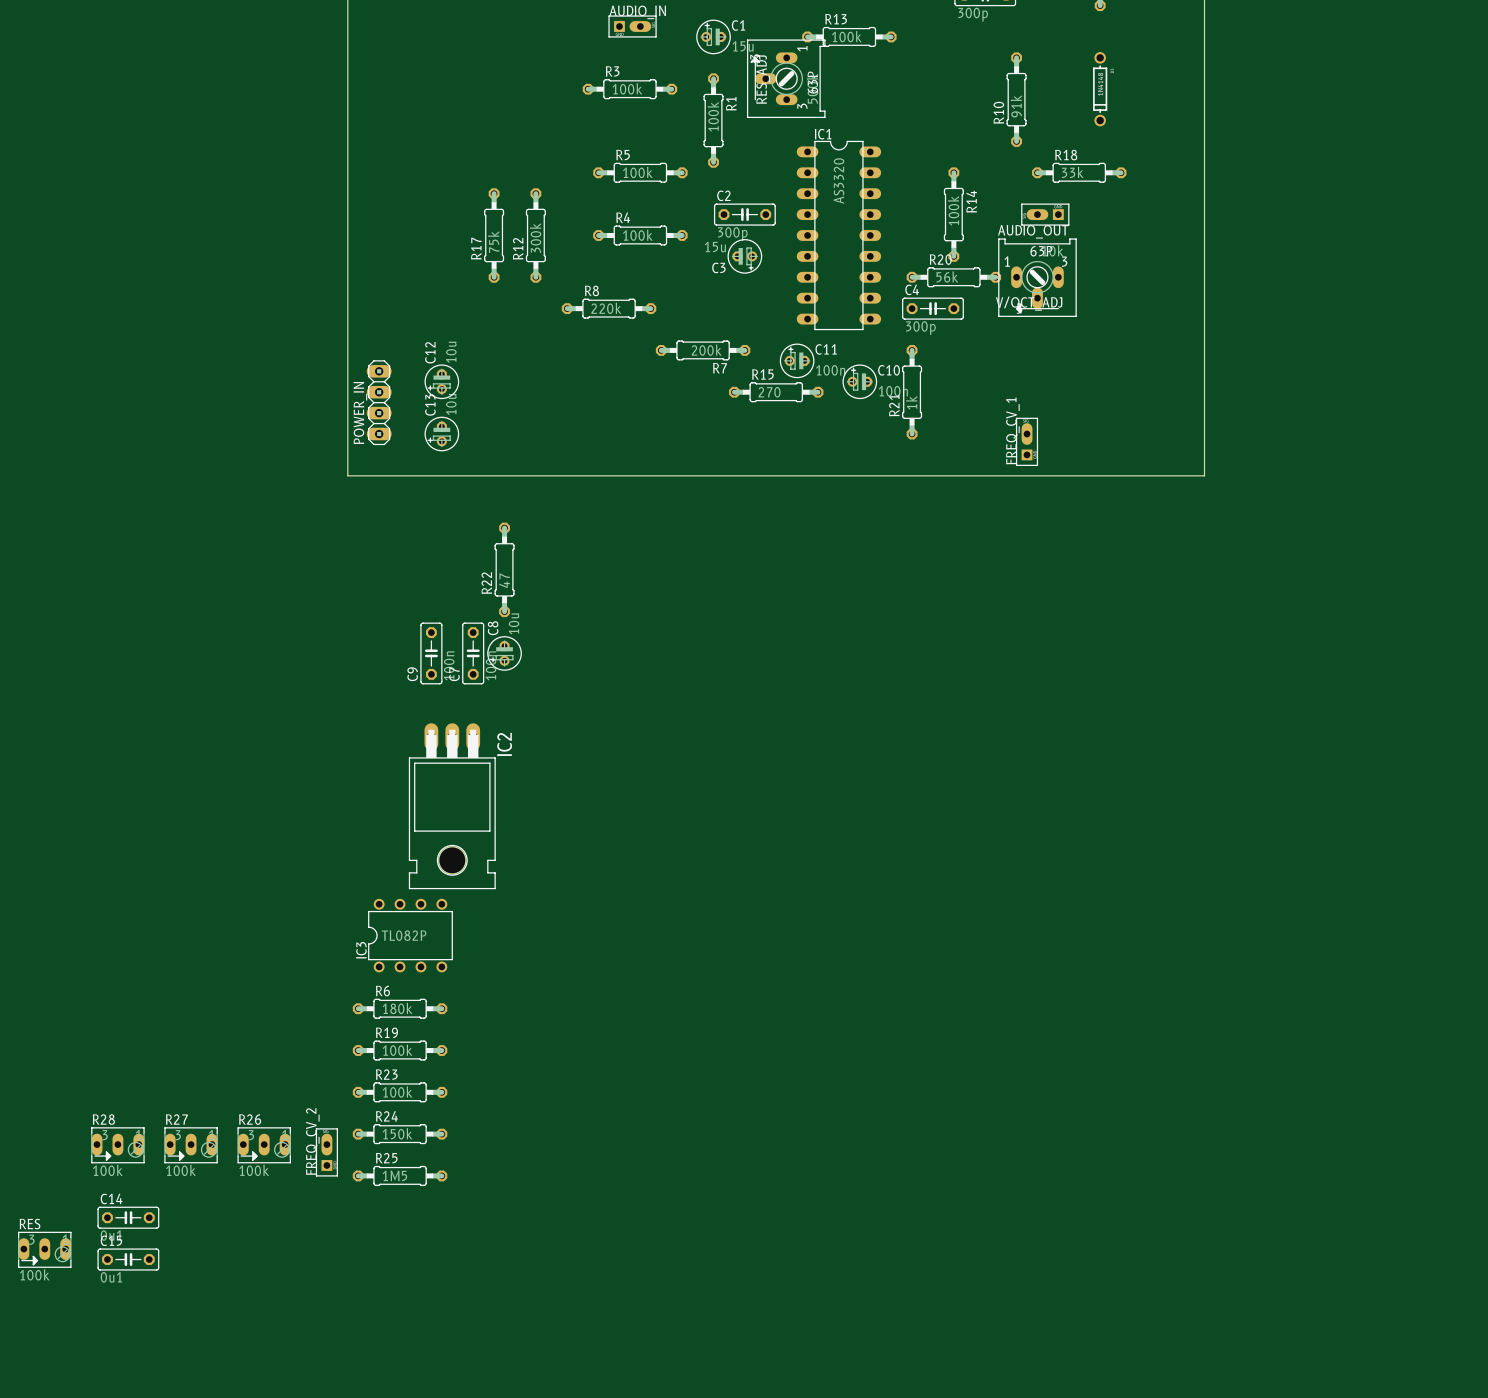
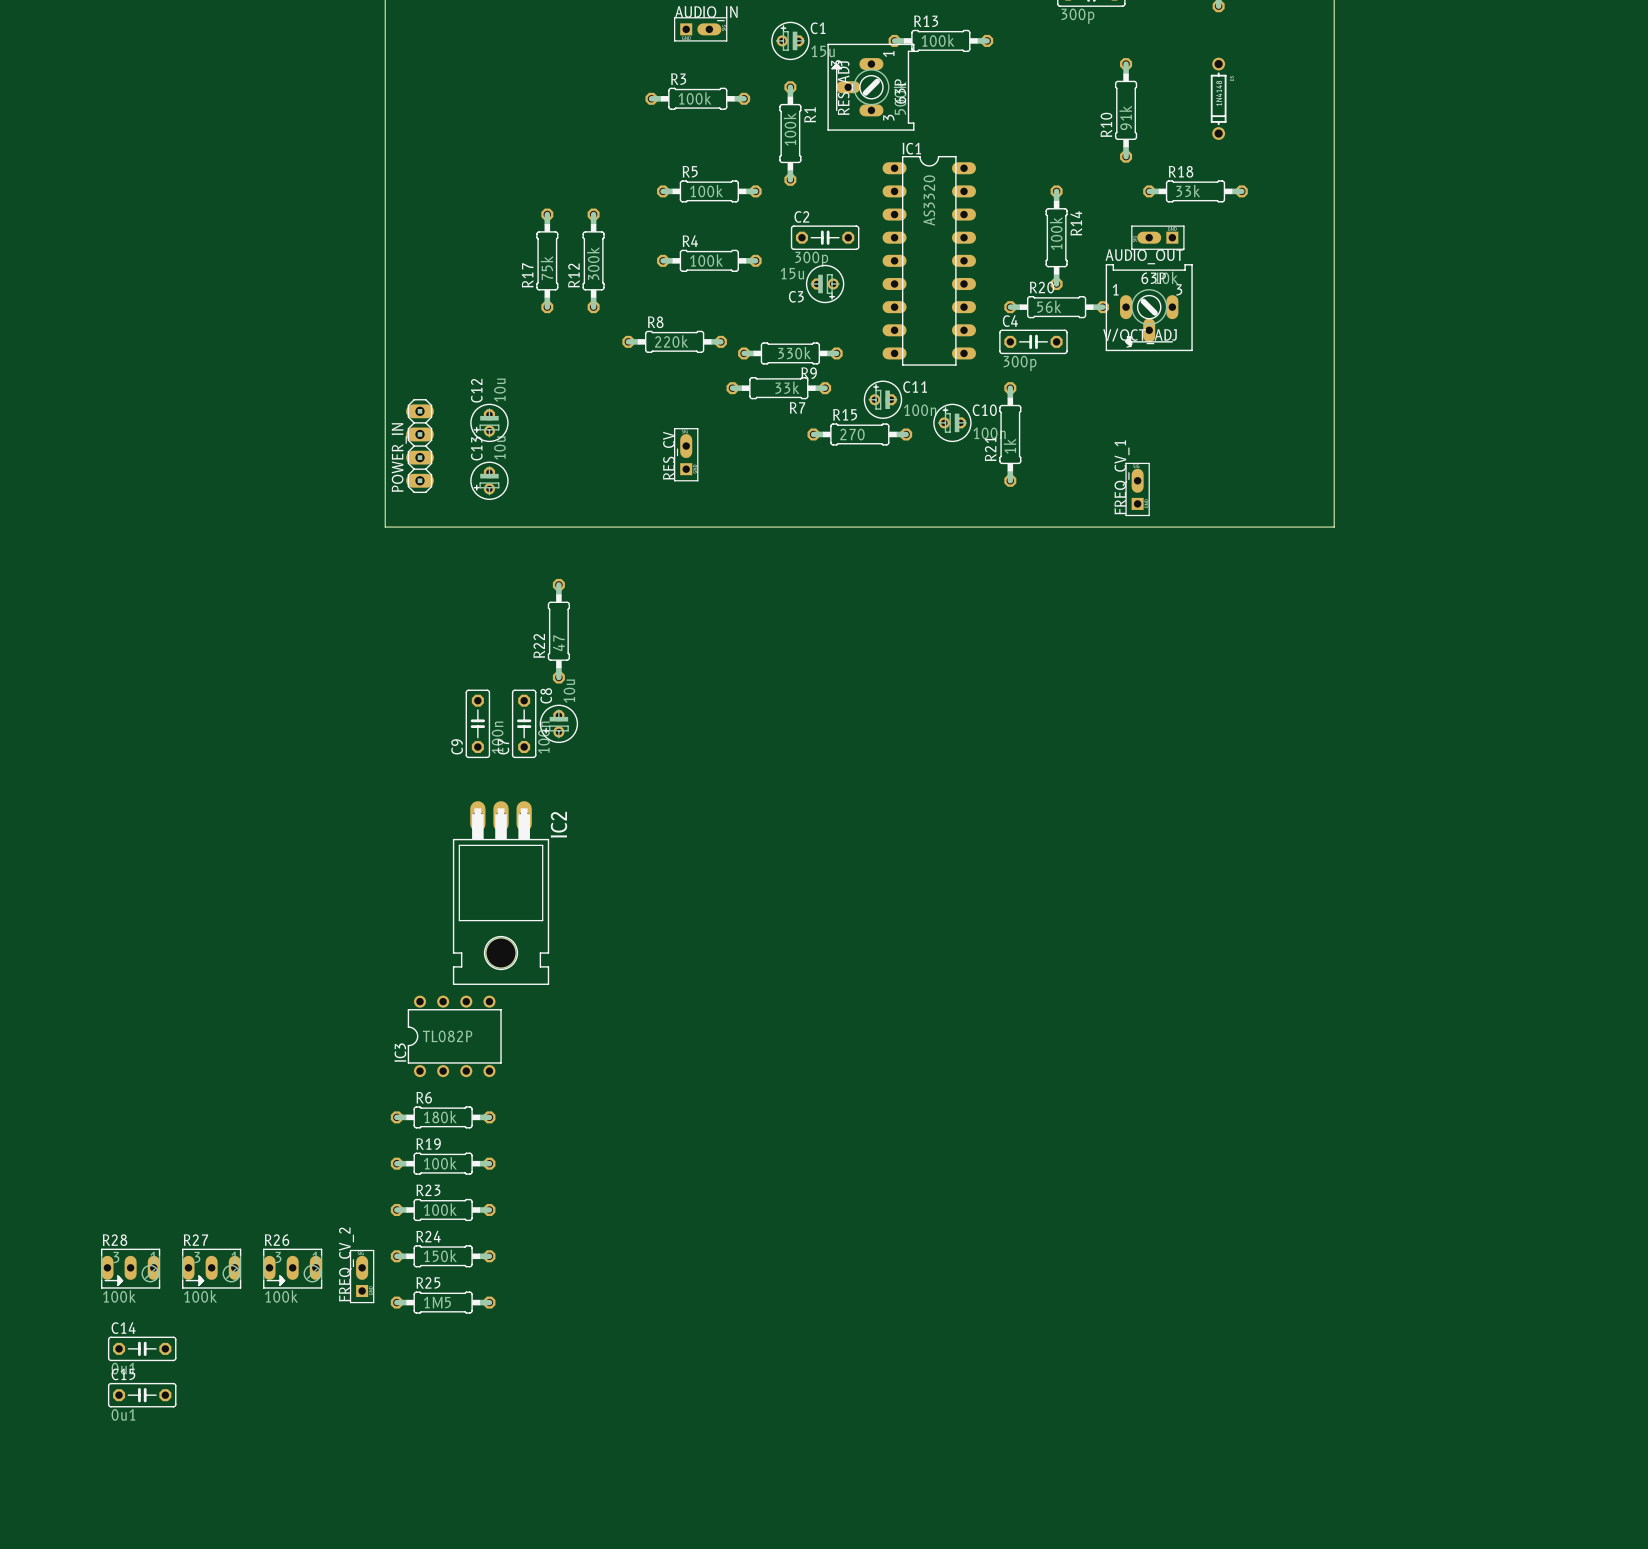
R9: none -> 330k (790, 353)
R7 value: 200k (706, 350) -> 33k (787, 387)
RES_CV: none -> (686, 454)
RES: 100k (44, 1249) -> none

